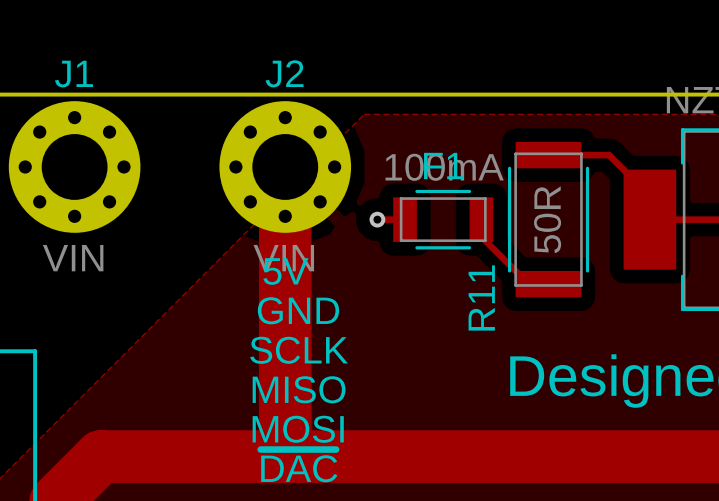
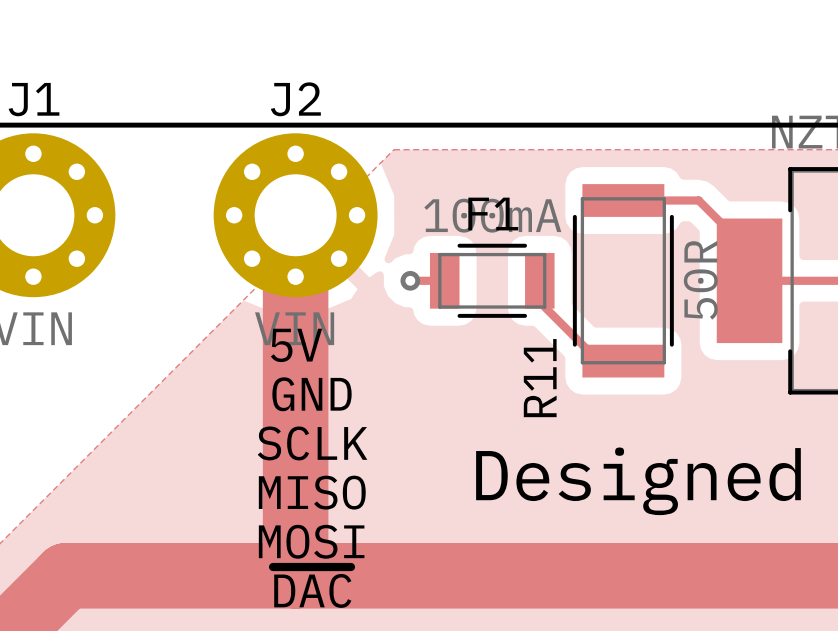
R11 value position: 50R (547, 219) -> 50R (700, 280)

